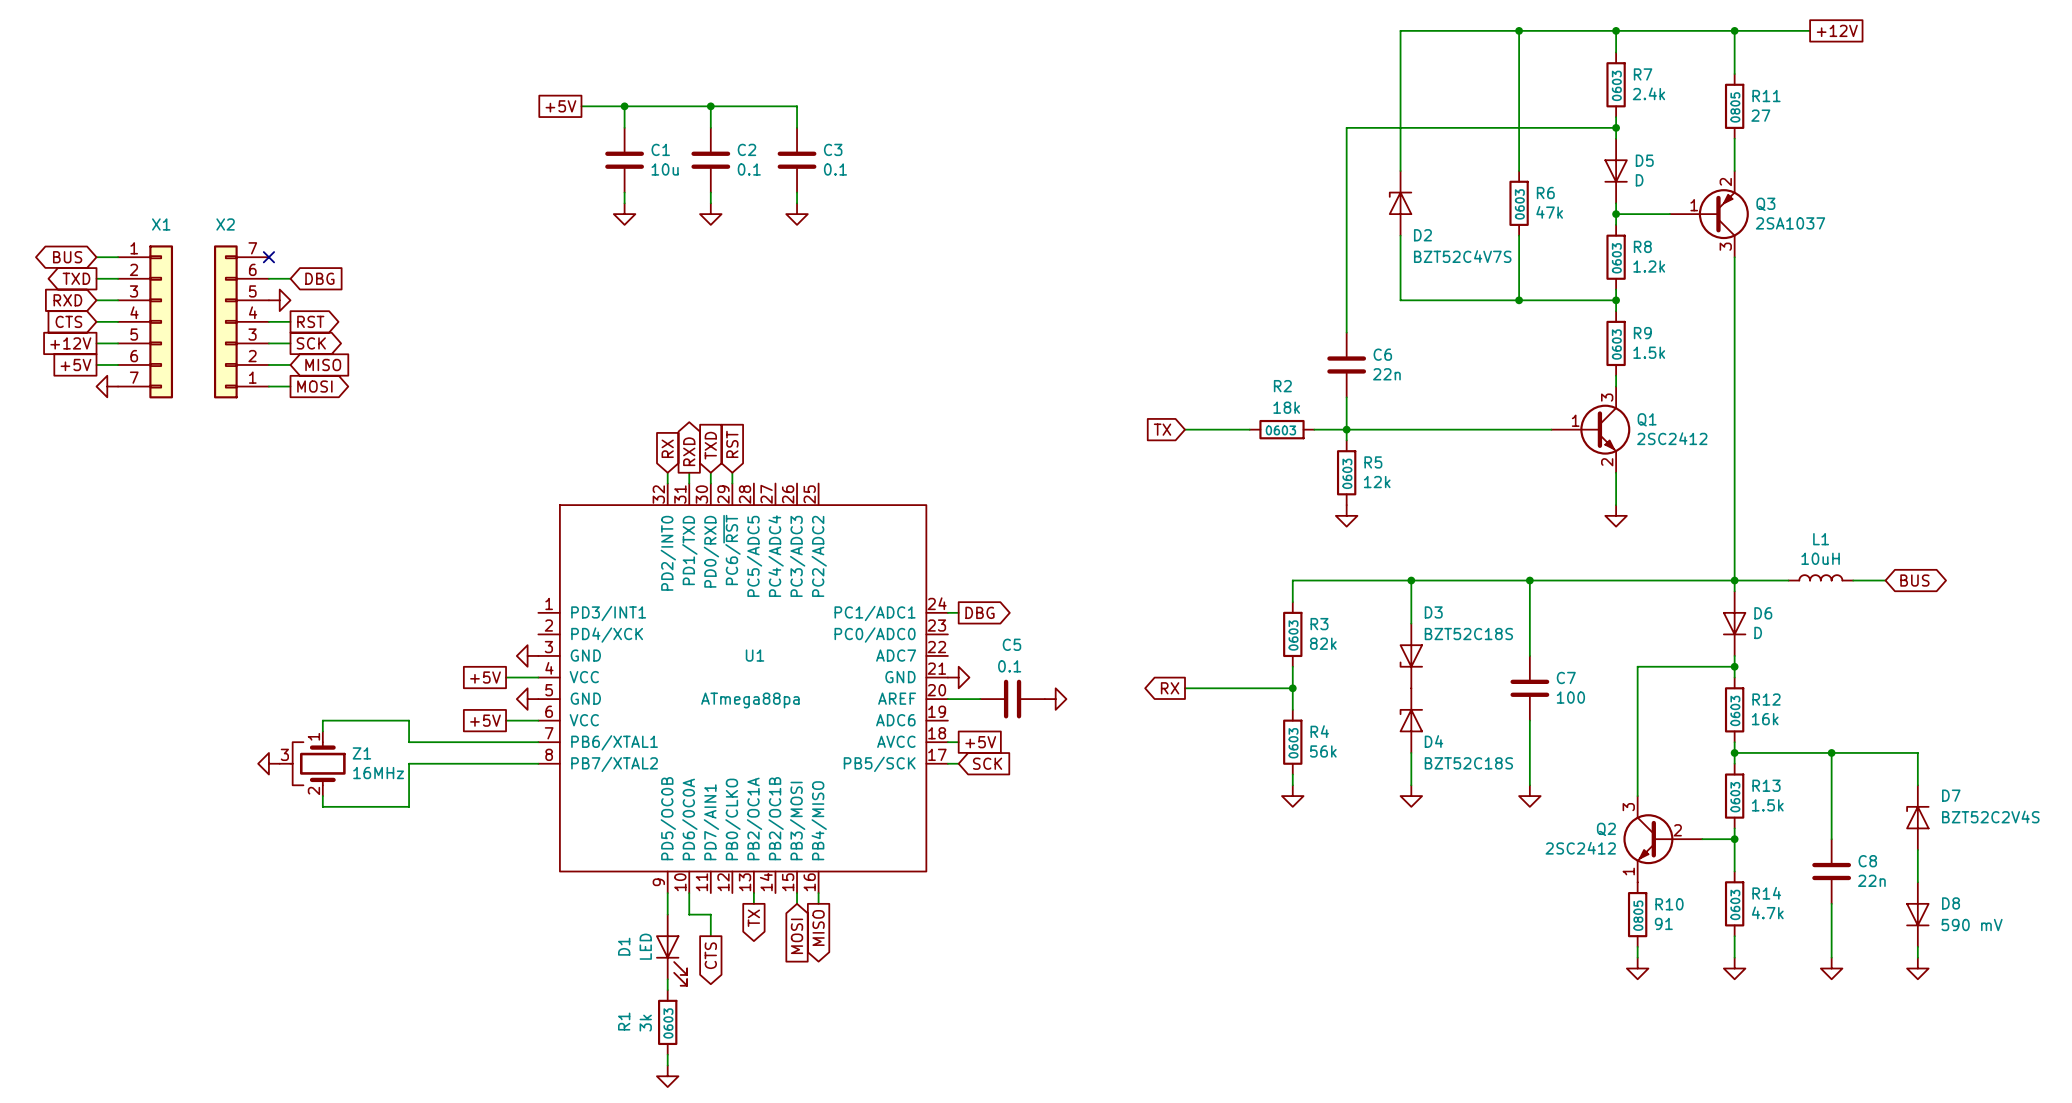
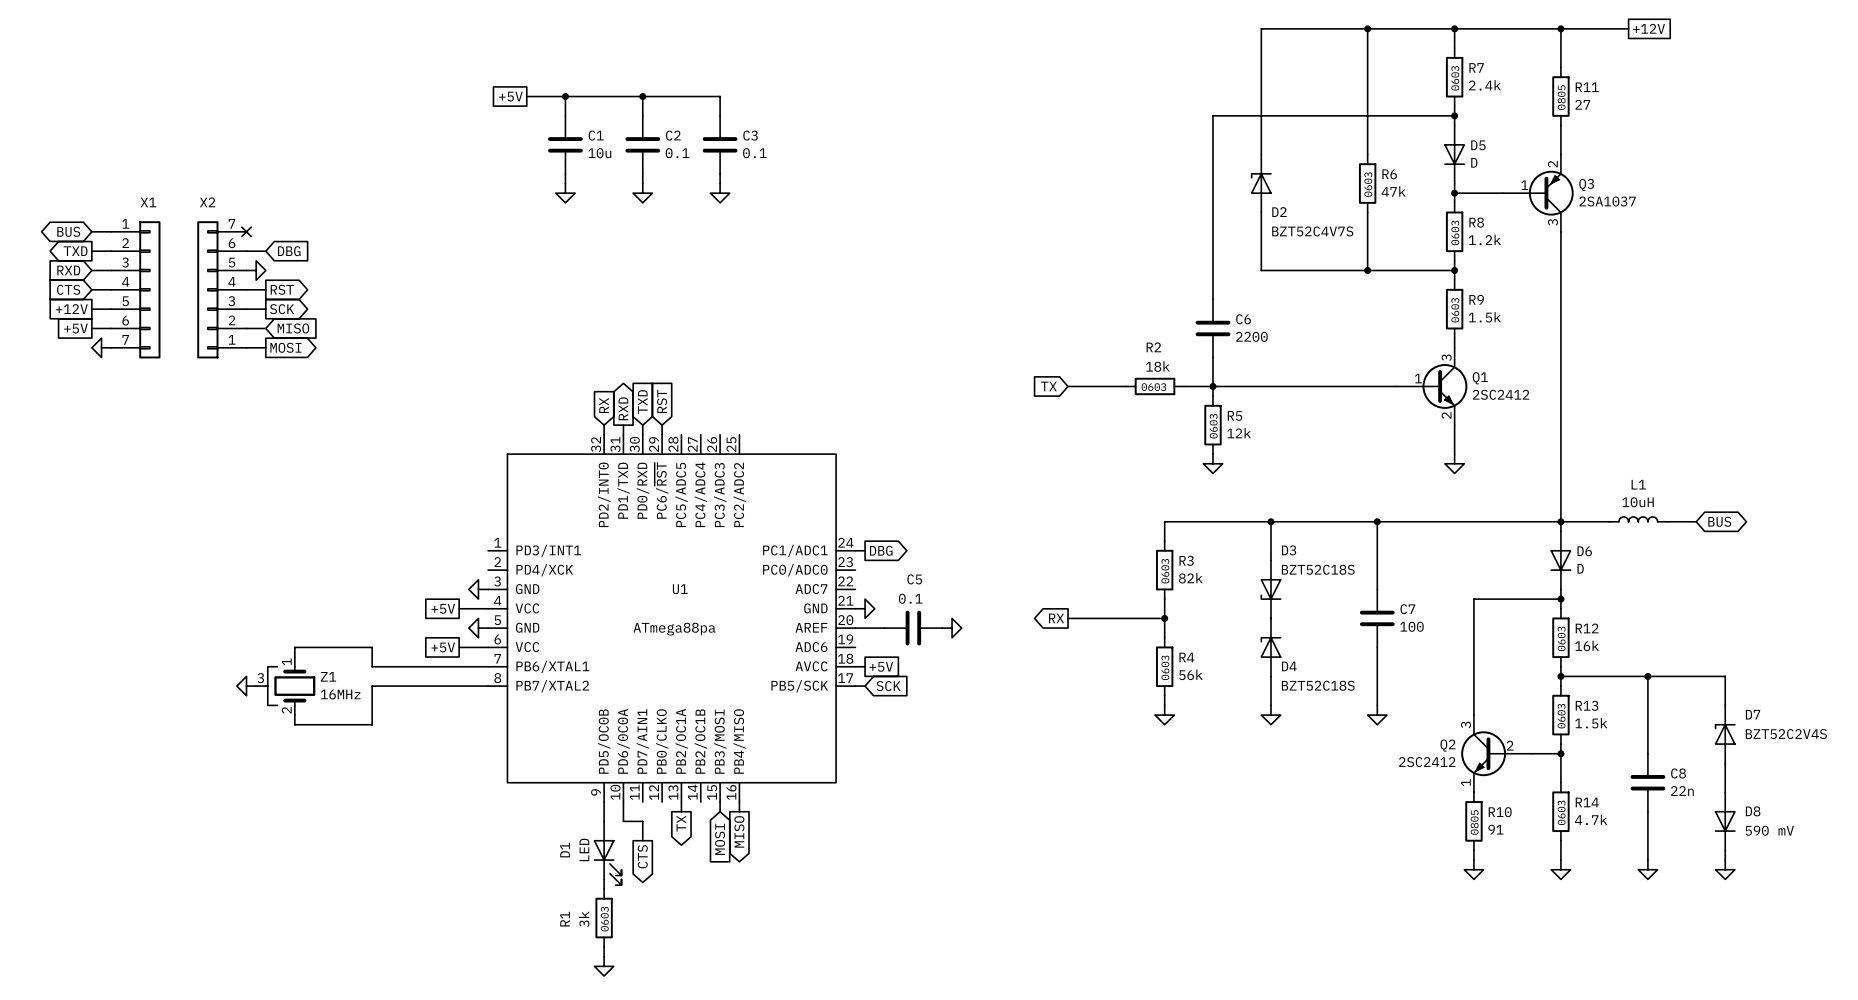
C6 value: 22n (1386, 374) -> 2200 (1251, 336)

